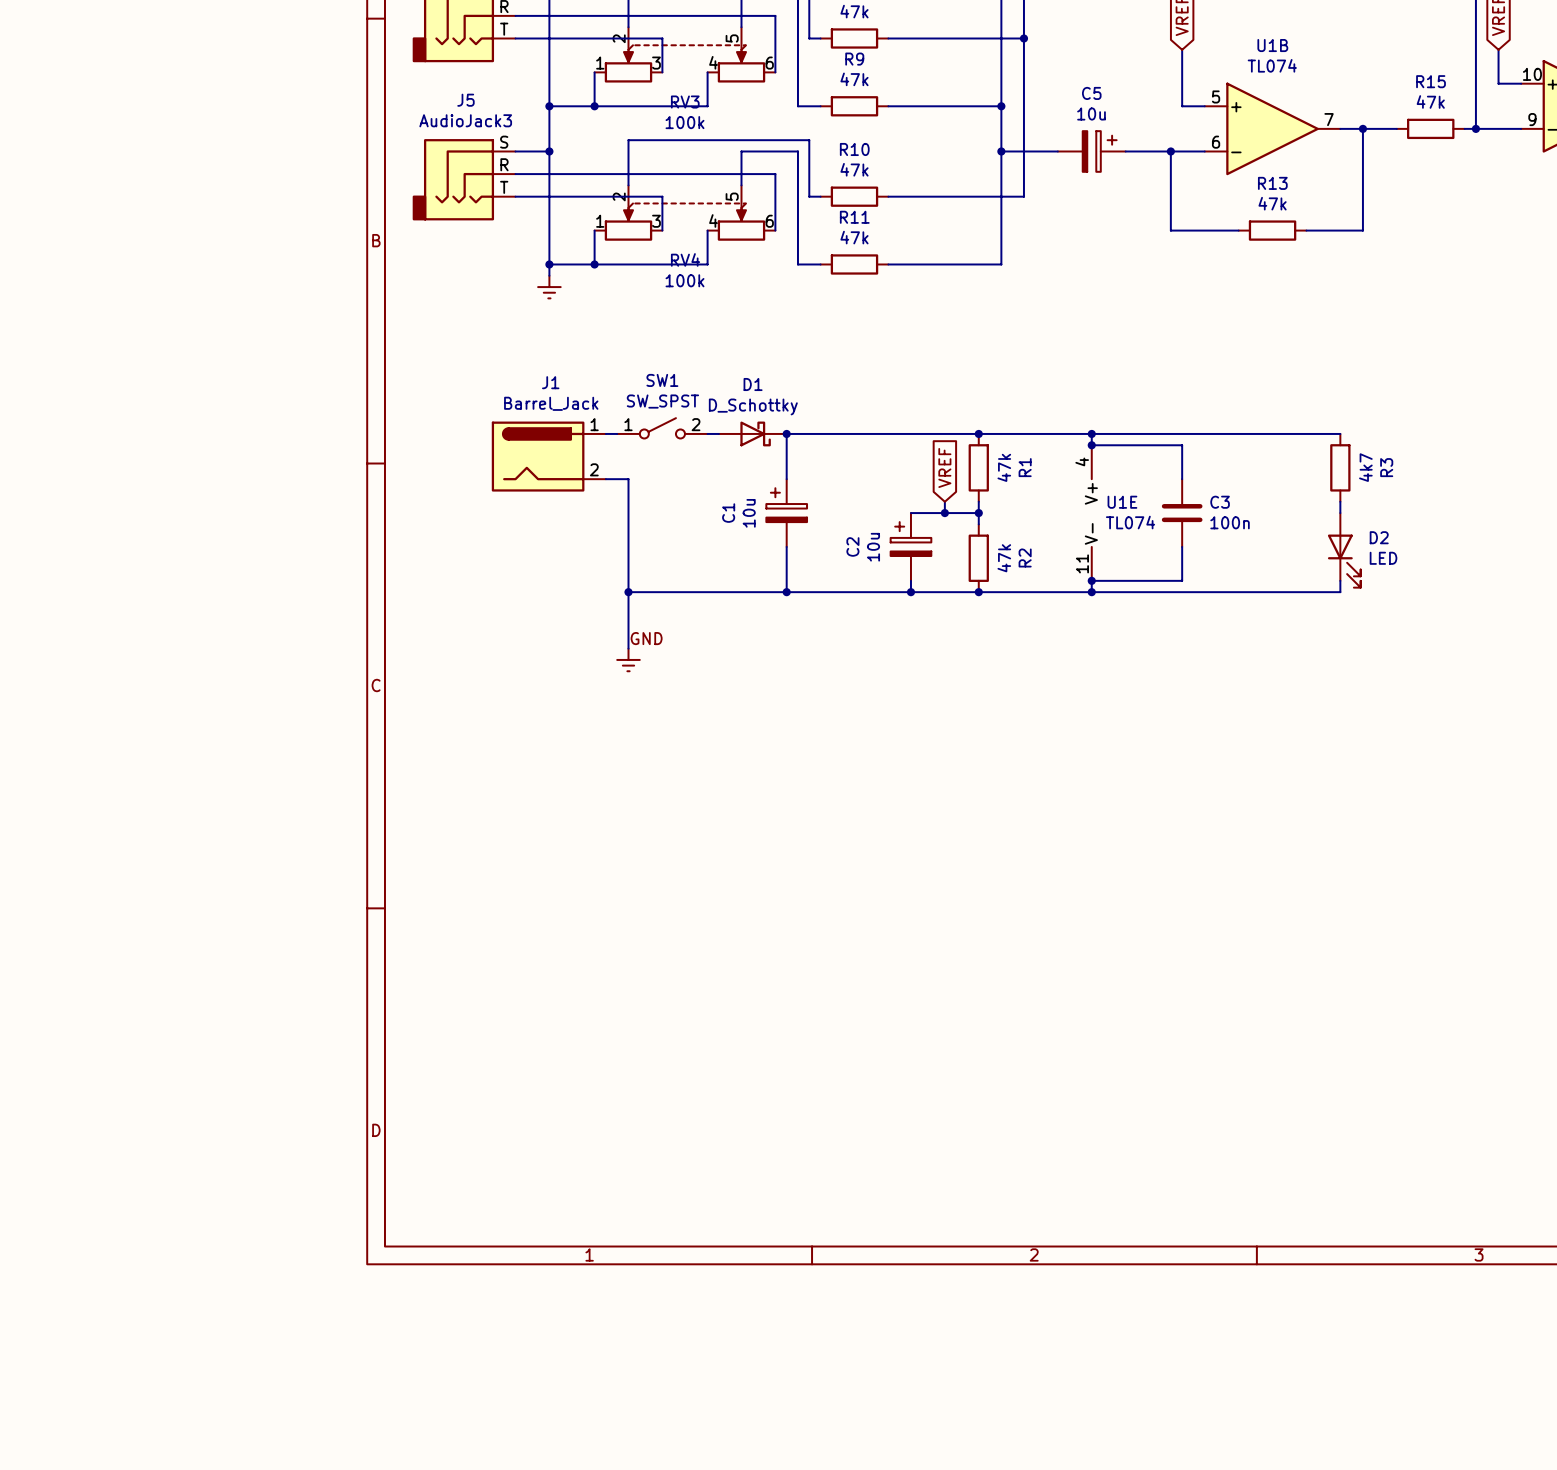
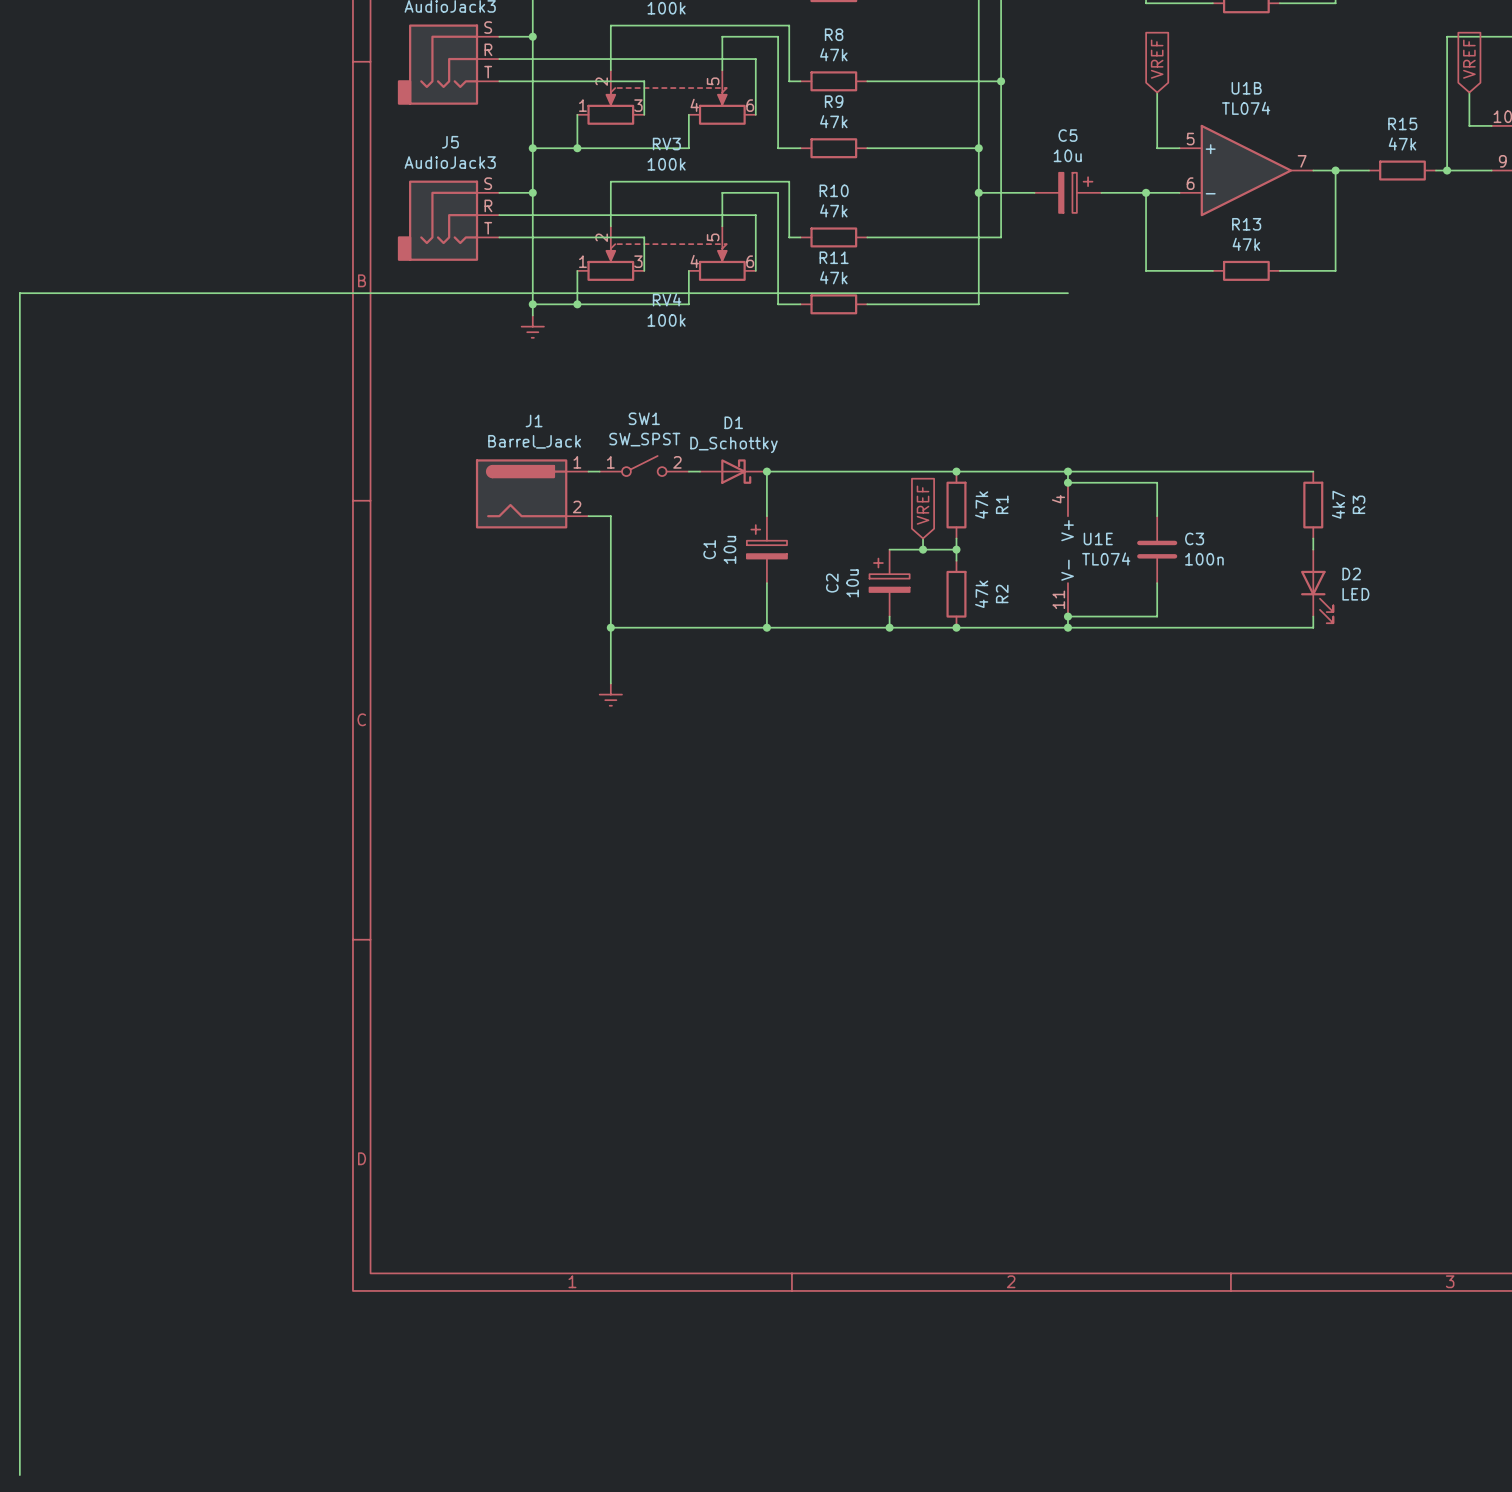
wire: none -> (1067, 293) (19, 293) (19, 1475)
label: GND (646, 638) -> none

